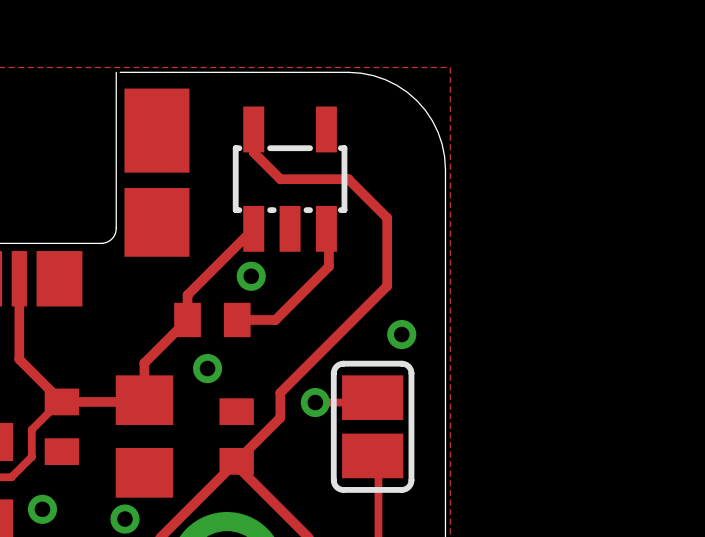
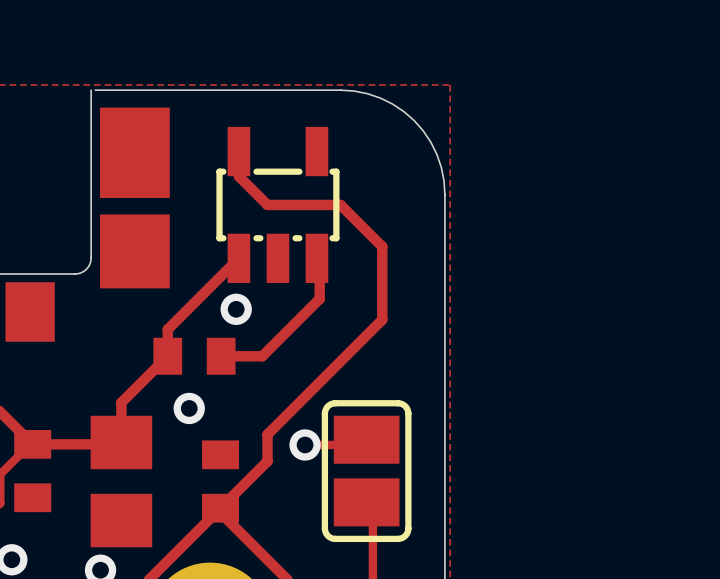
via: (401, 334) -> none

